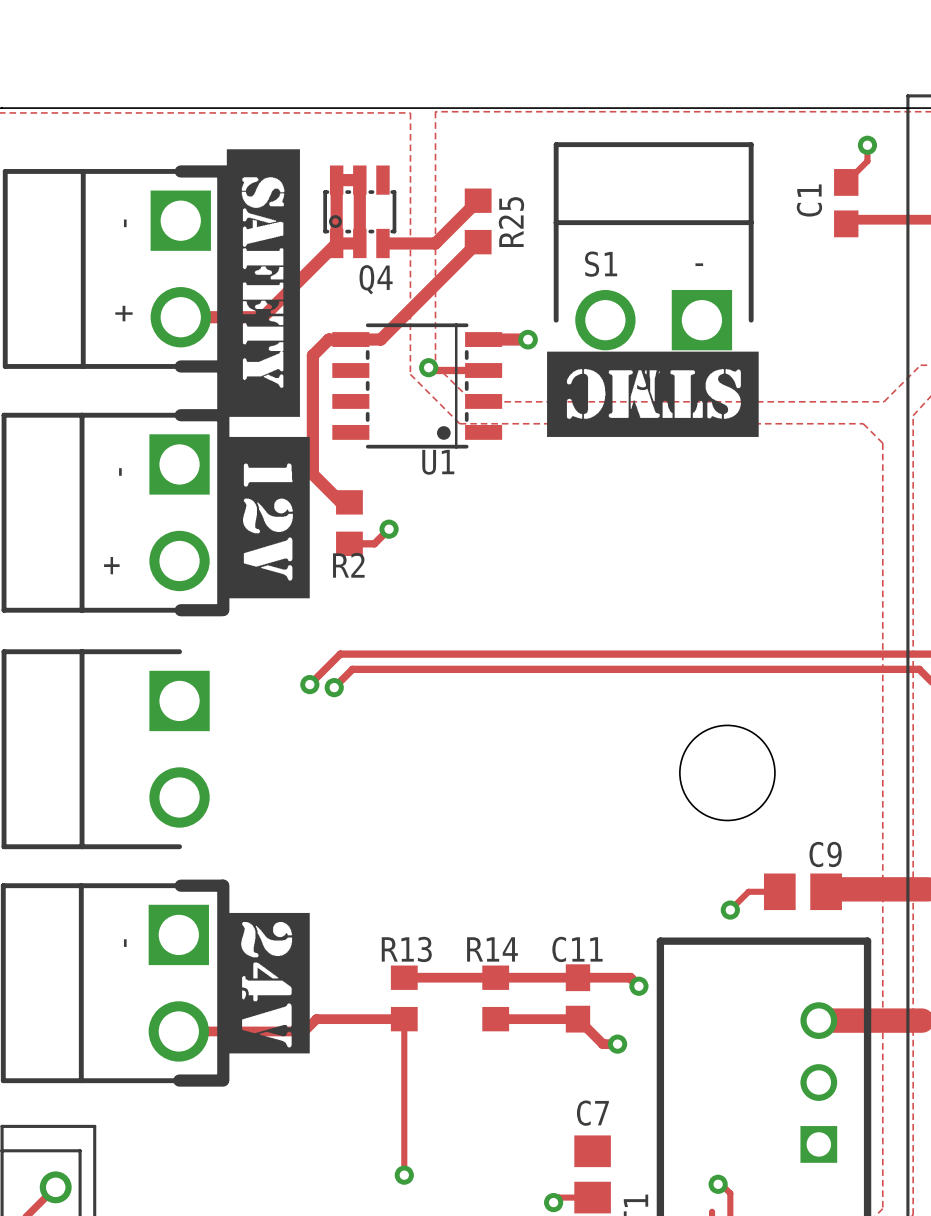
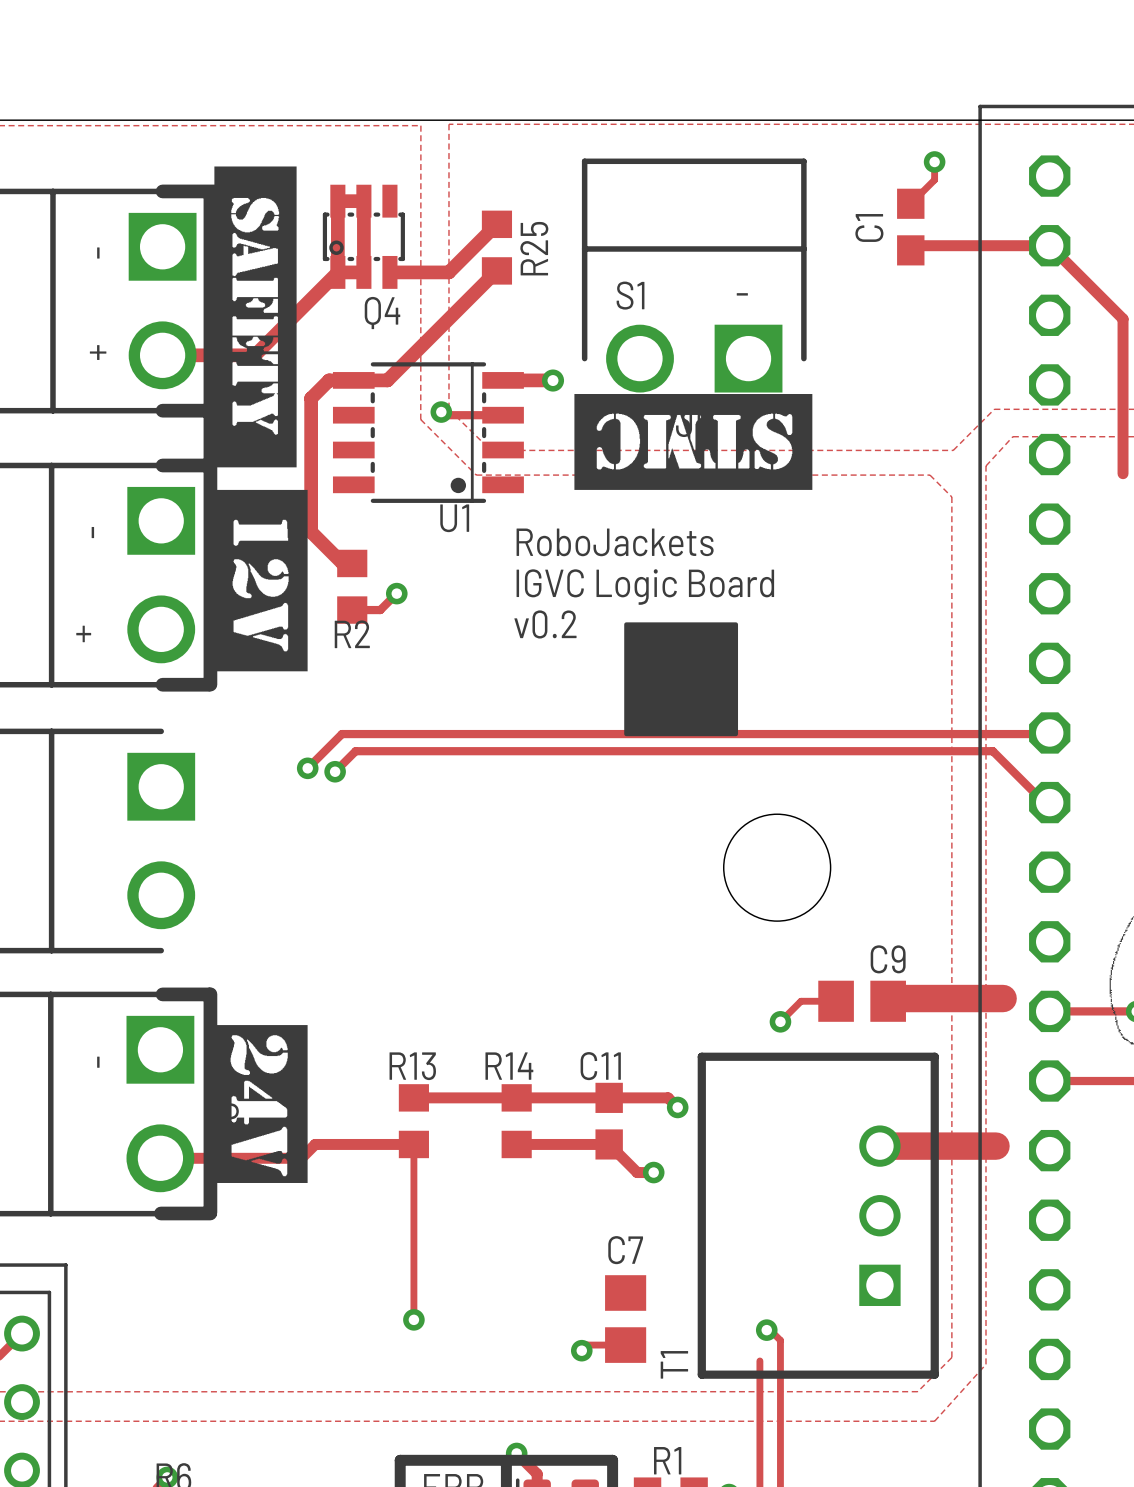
text: none -> RoboJackets (615, 542)
text: none -> IGVC Logic Board (645, 587)
drawing: none -> [624, 622, 739, 737]
text: none -> v0.2 (545, 624)

